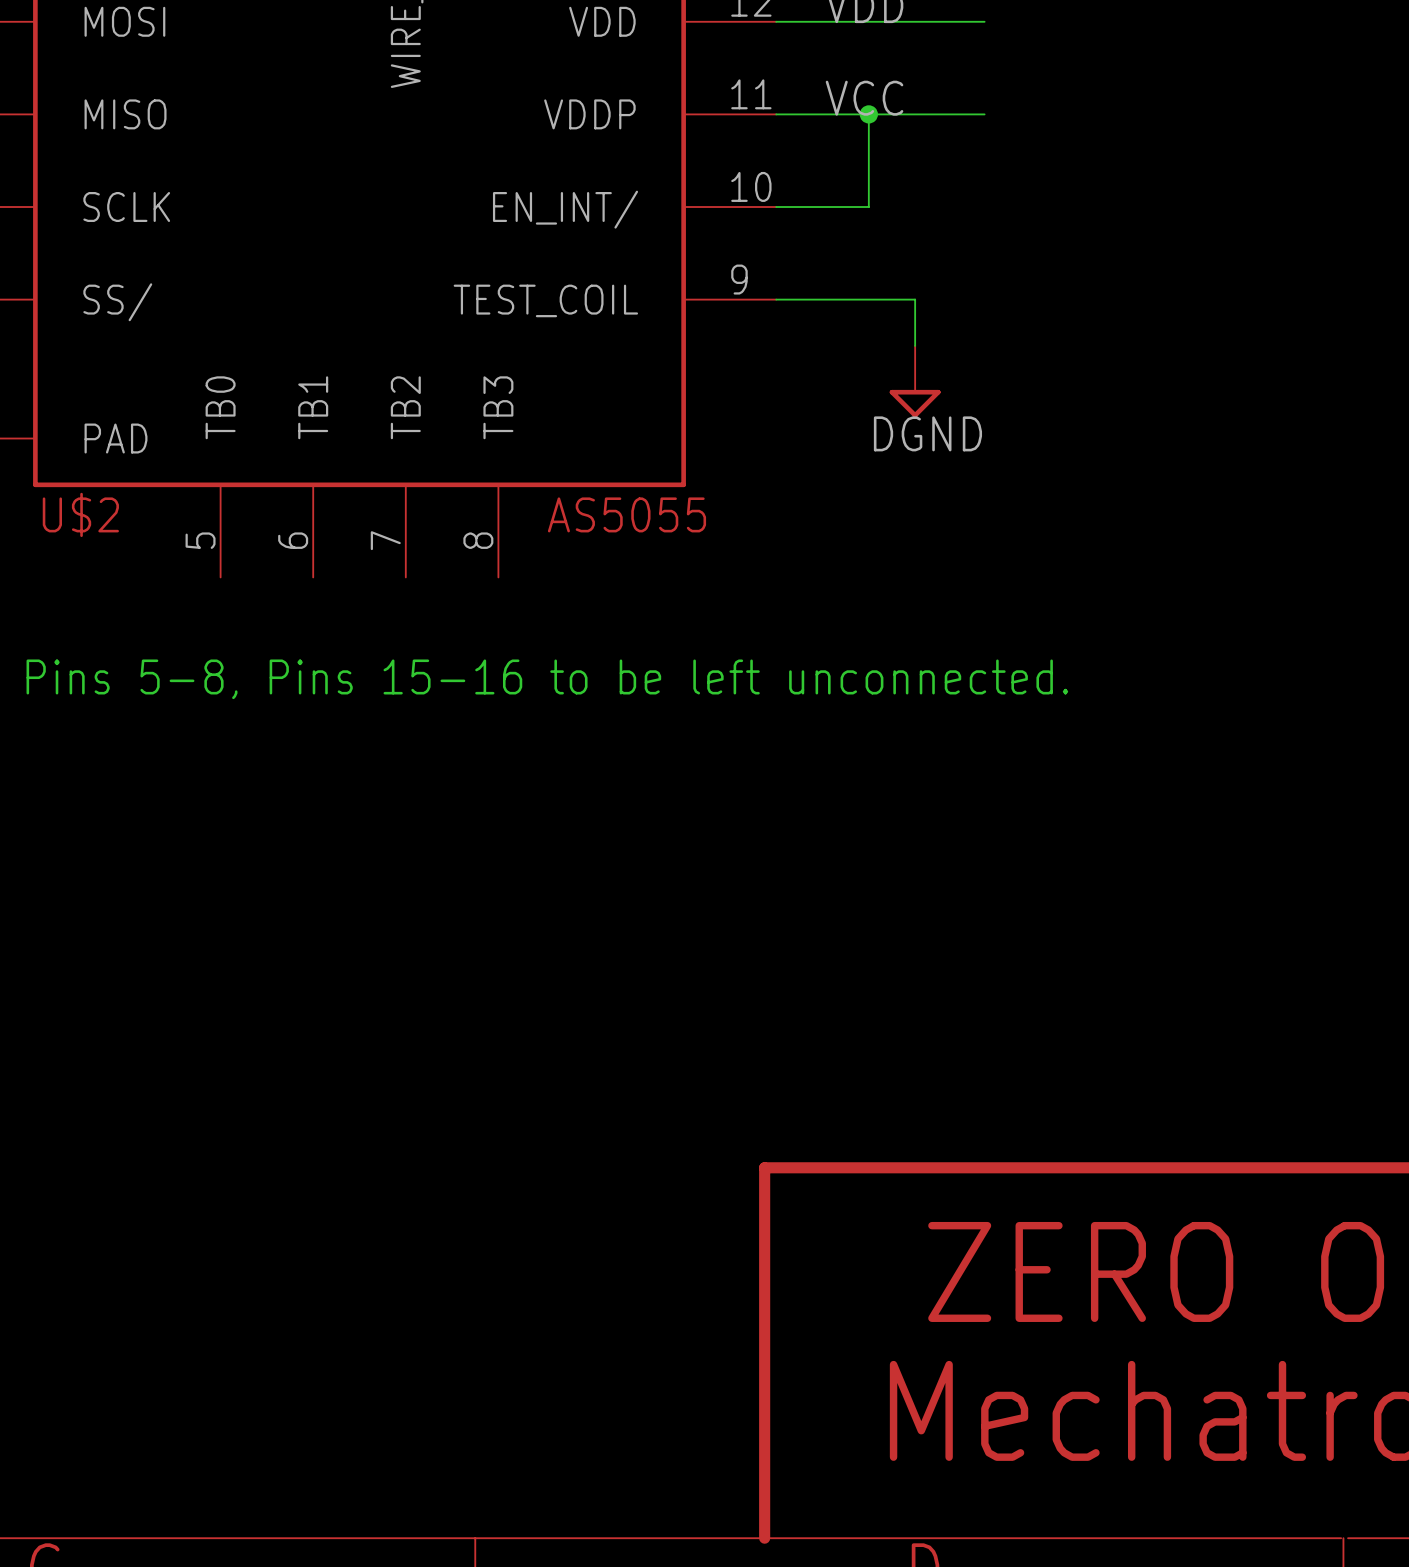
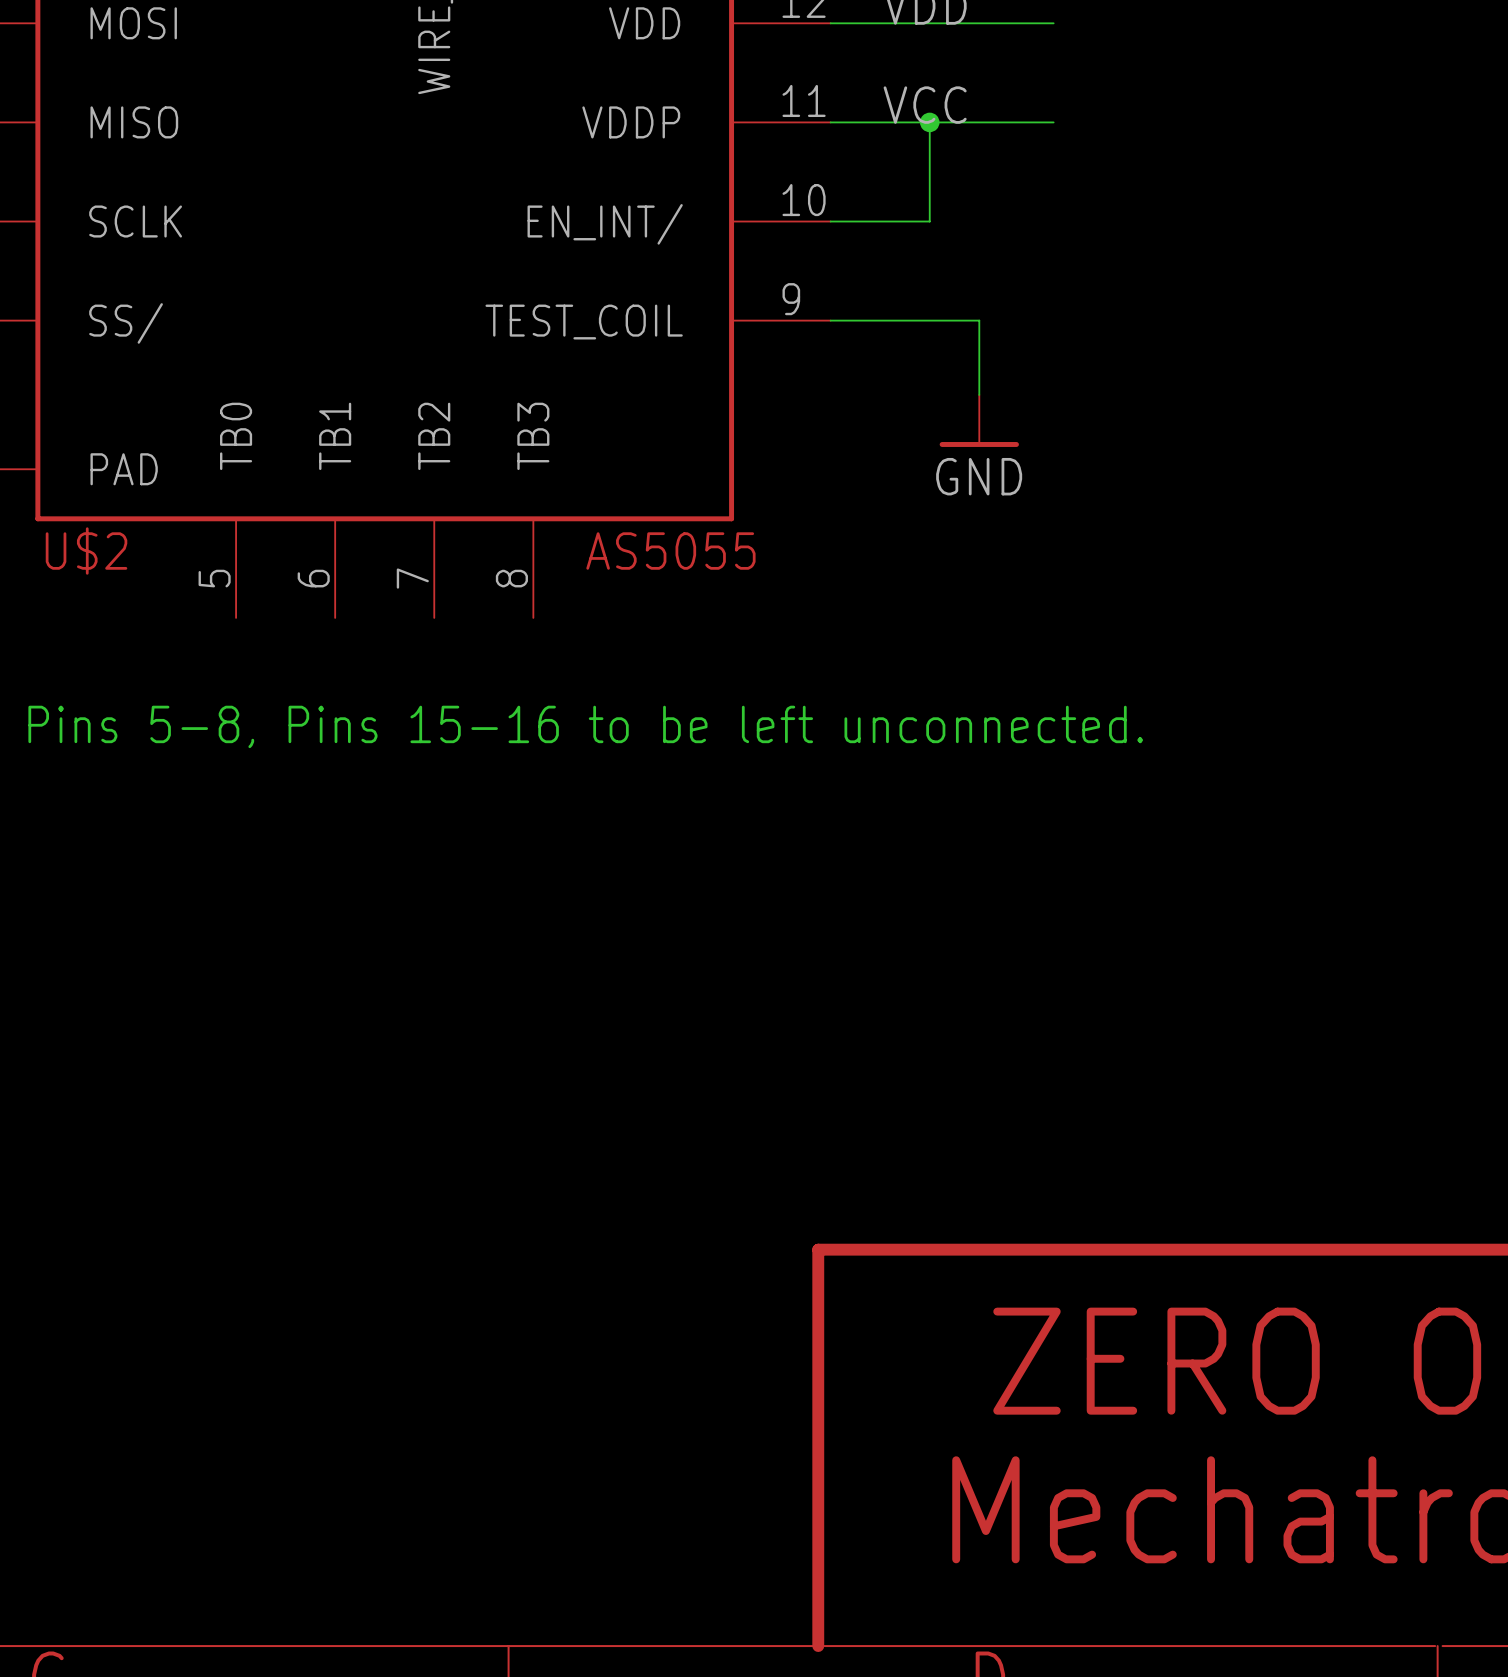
power symbol: DGND (915, 381) -> GND (979, 420)

